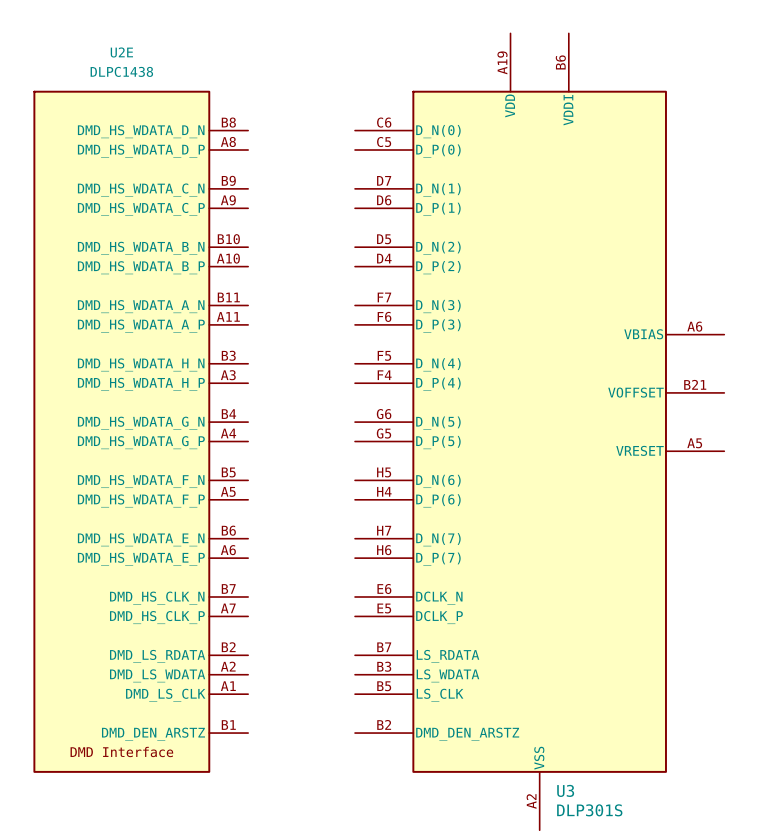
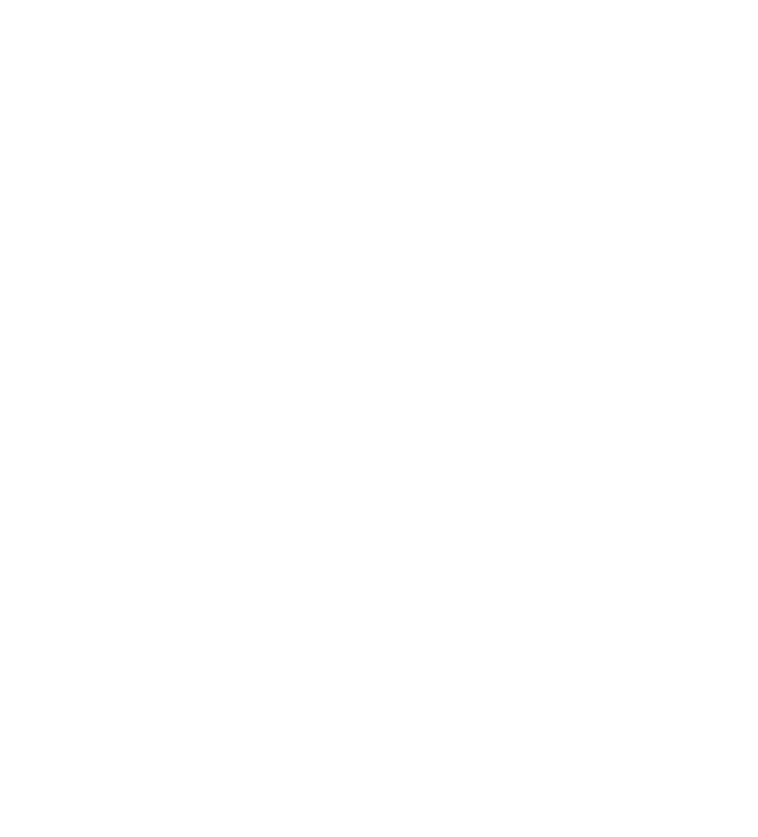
U2E: DLPC1438 (140, 431) -> none
U3: DLP301S (539, 431) -> none

